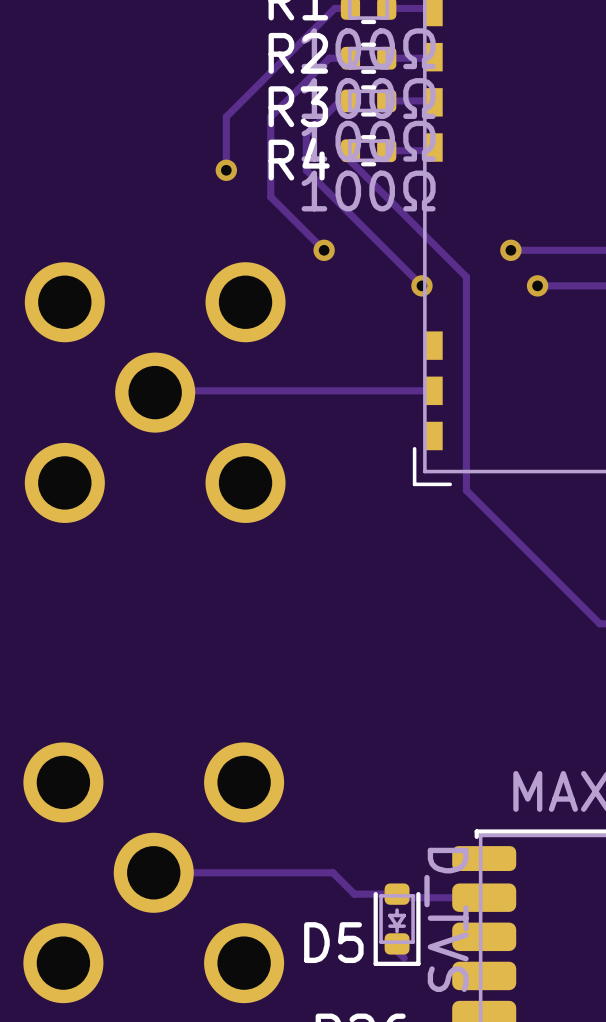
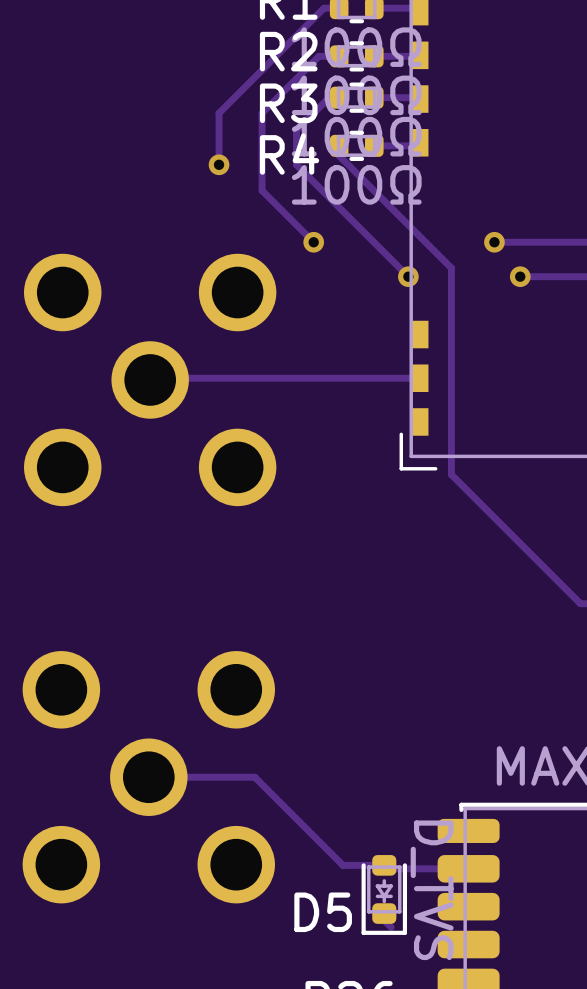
part position: (153, 872) -> (148, 777)
track: (333, 872) (148, 872) (175, 899) -> (322, 844) (254, 777) (148, 777)

